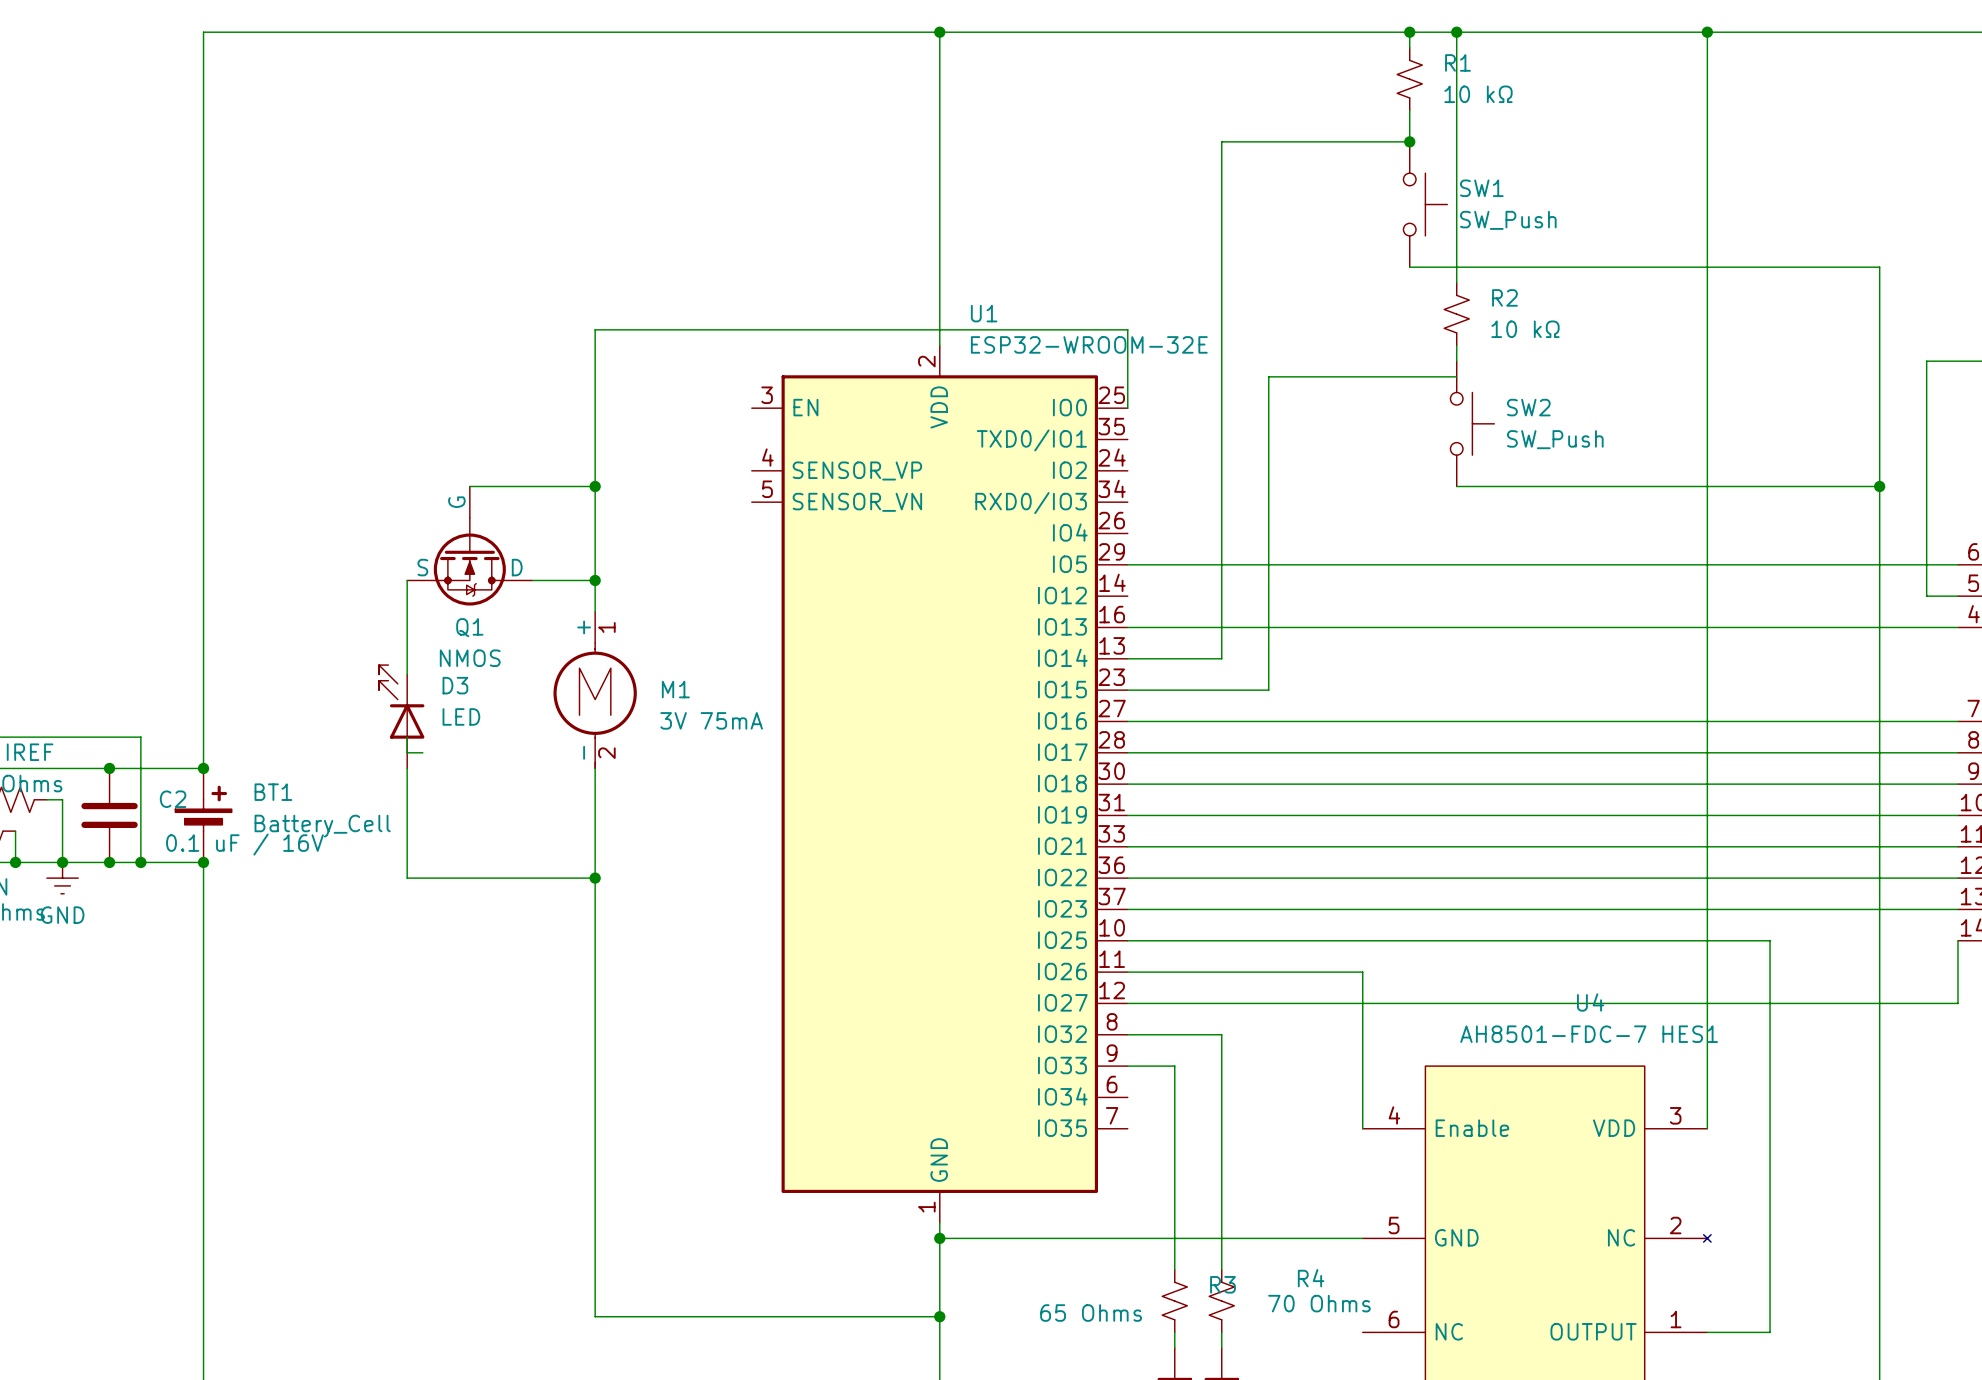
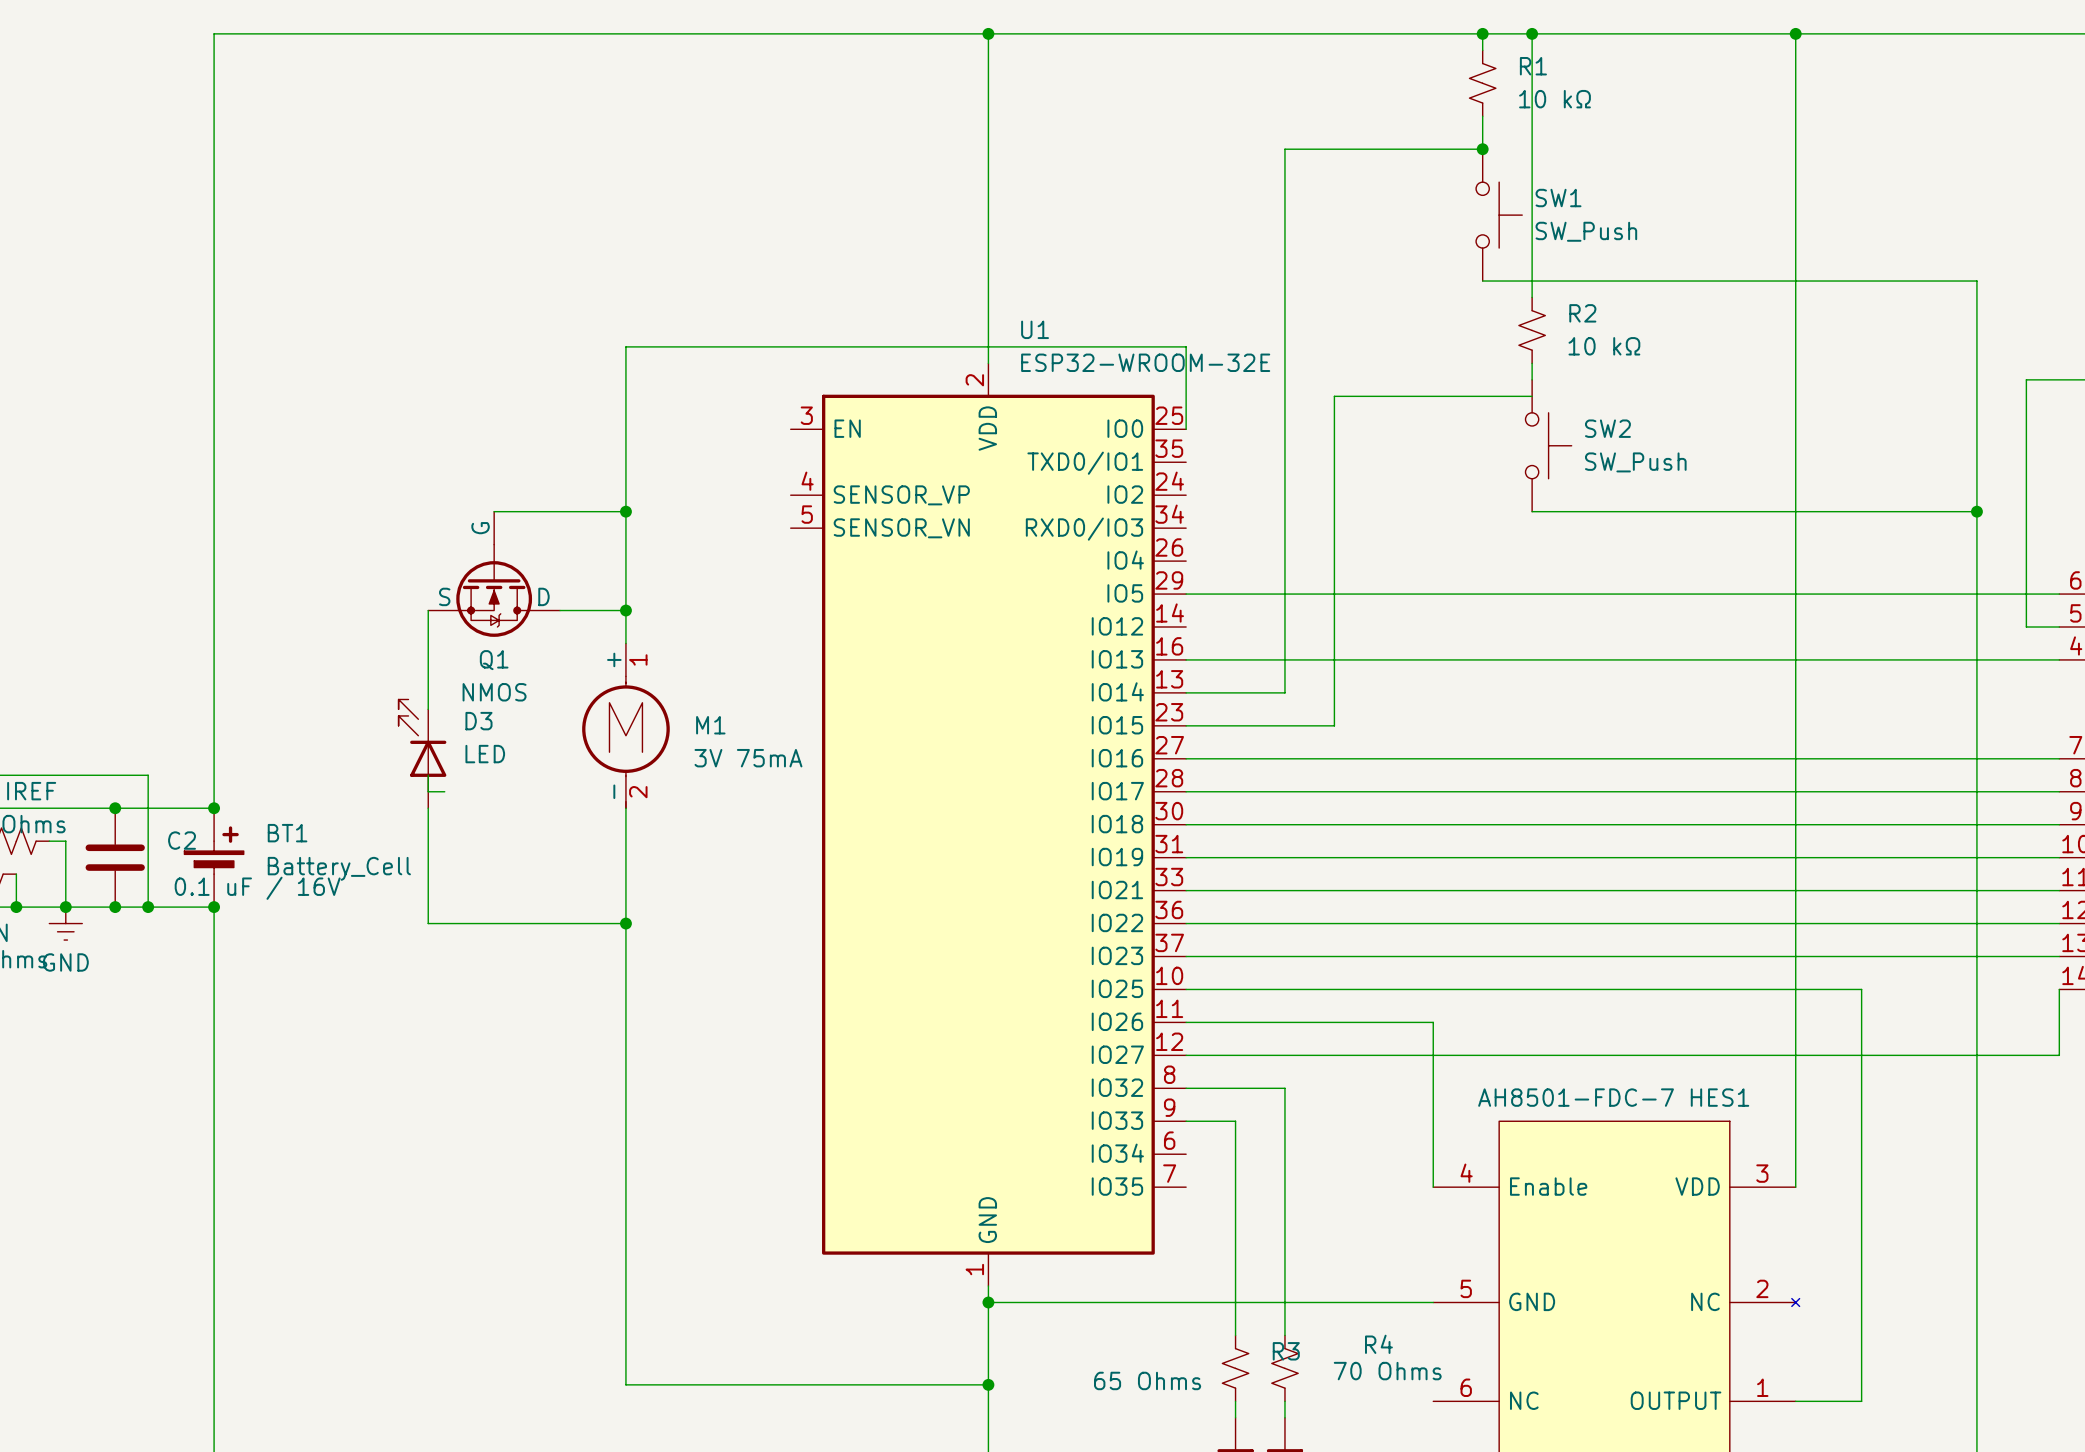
U4 name: U4 (1590, 1002) -> AH8501-FDC-7 HES1 (1613, 1097)
U4 value: AH8501-FDC-7 HES1 (1589, 1034) -> none

